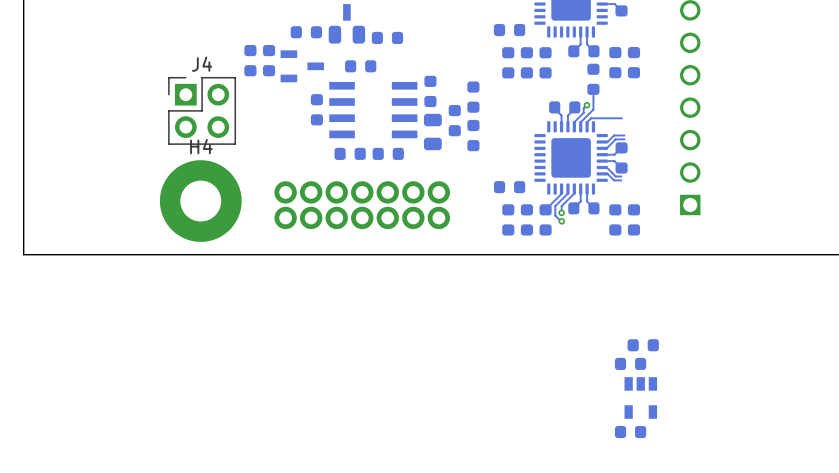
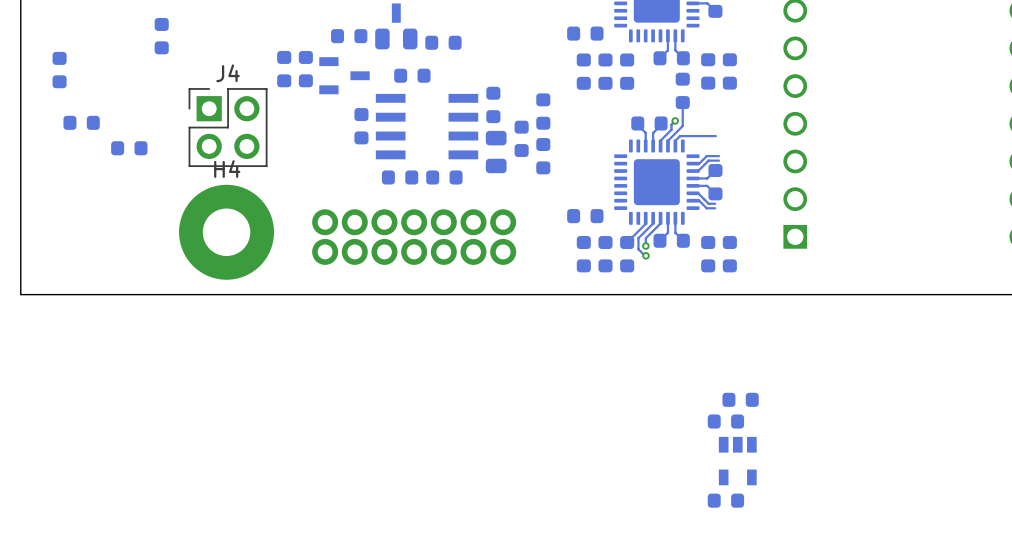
part: none -> (161, 36)
part: none -> (59, 70)
part: none -> (81, 122)
part: none -> (129, 148)

